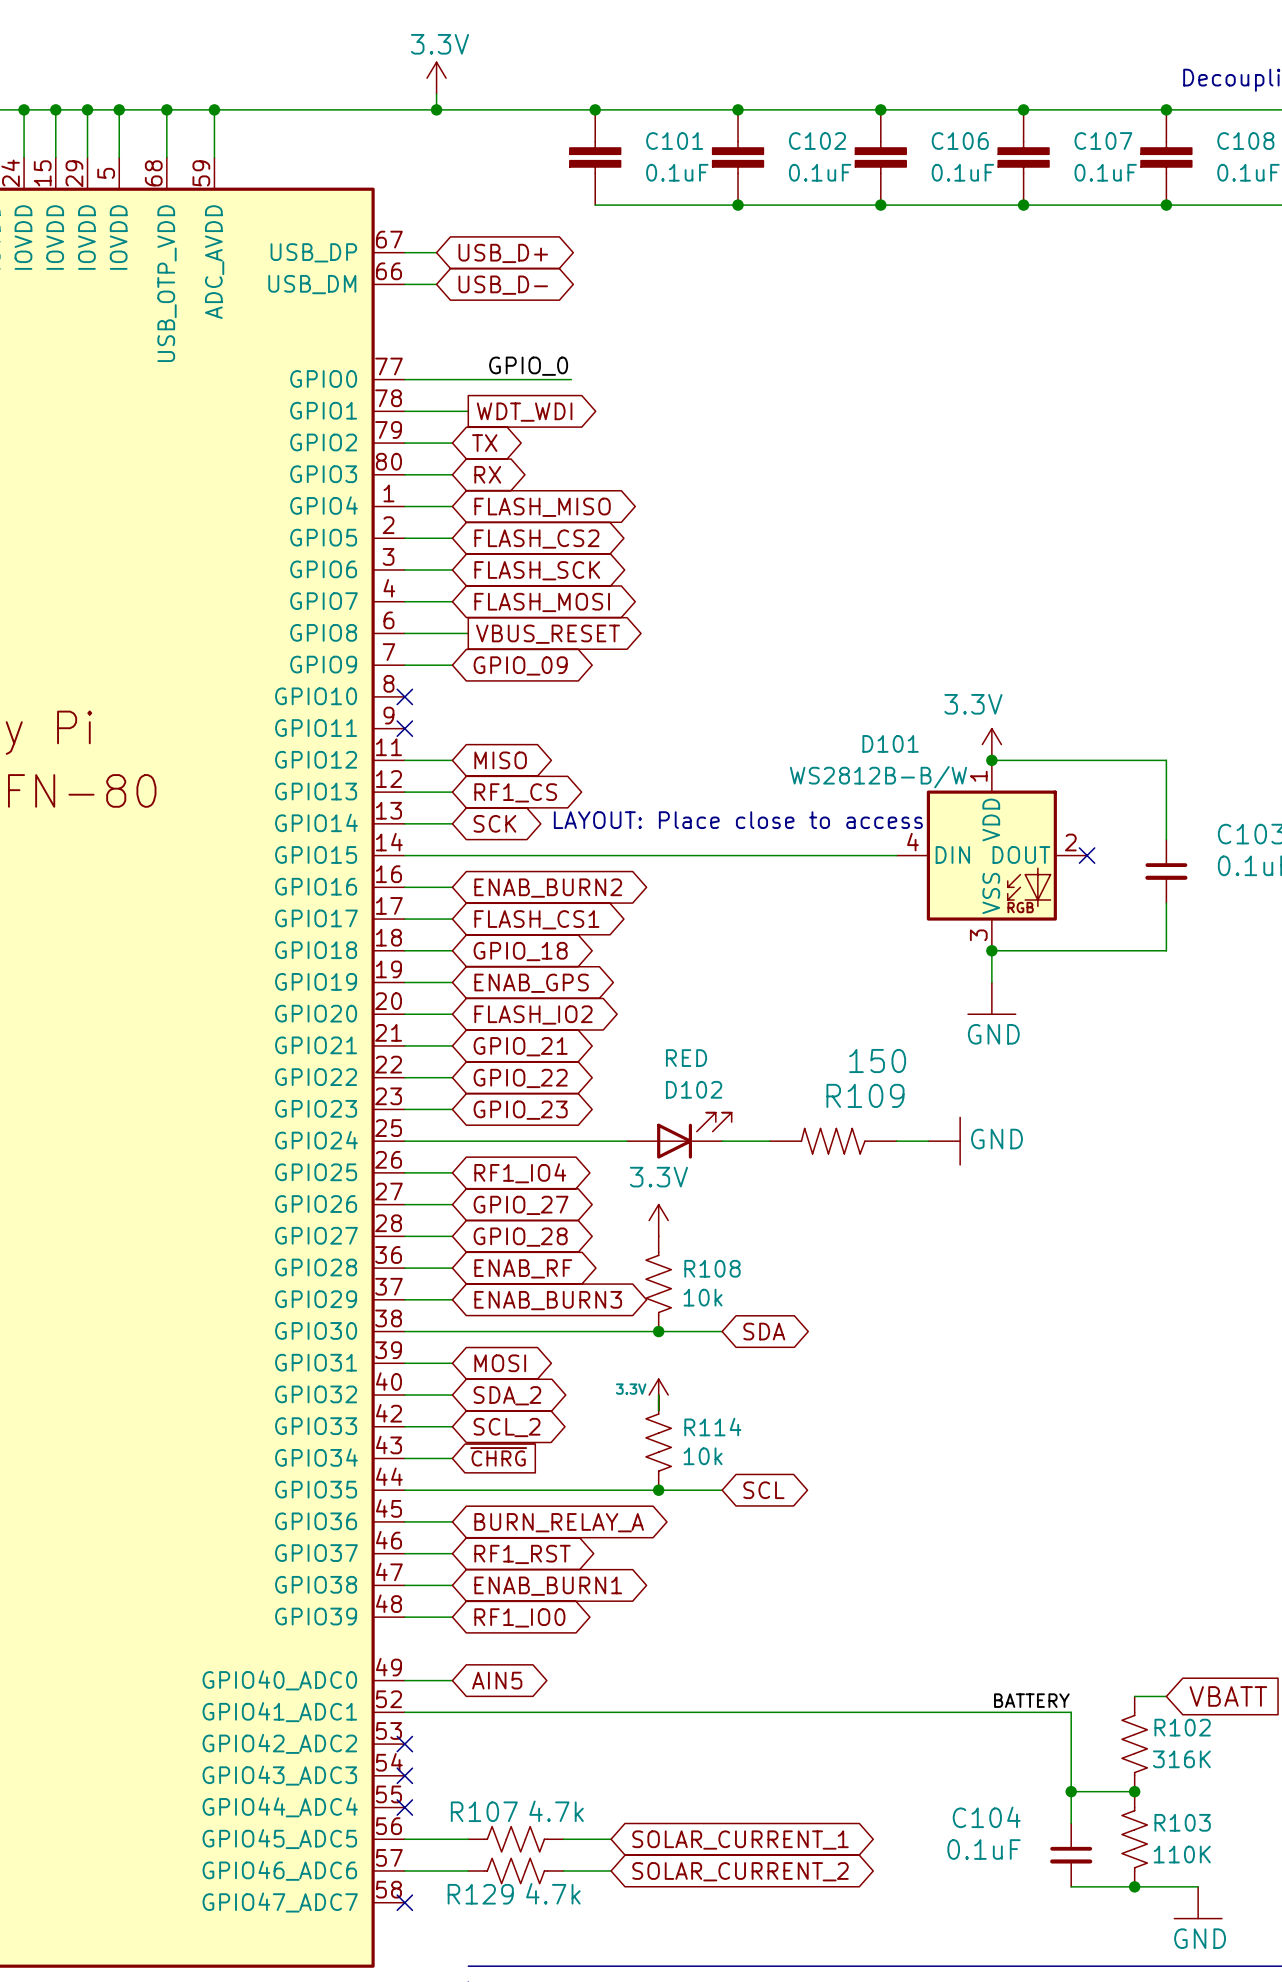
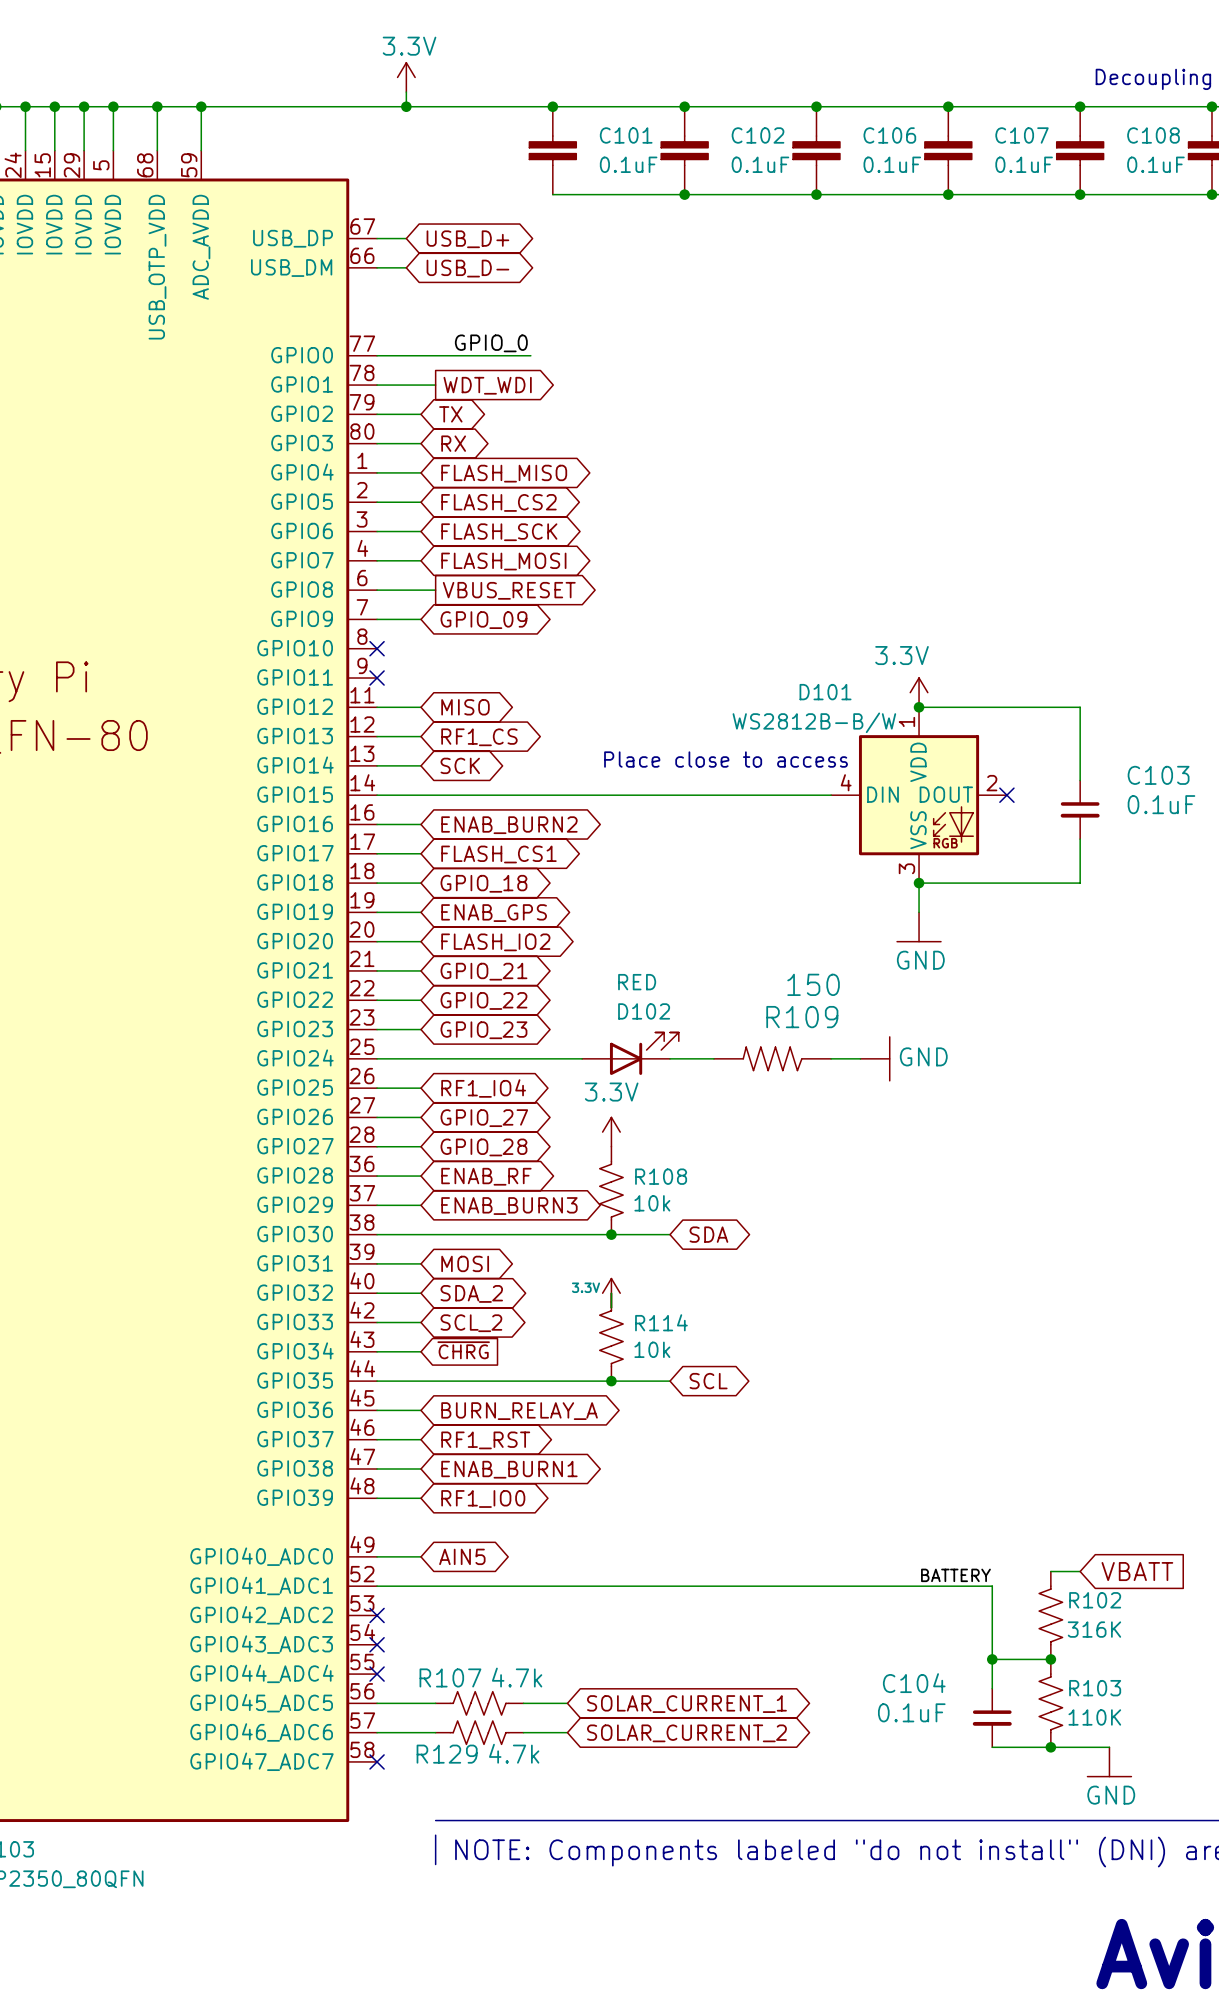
text: LAYOUT: Place close to access (738, 820) -> Place close to access (726, 759)

